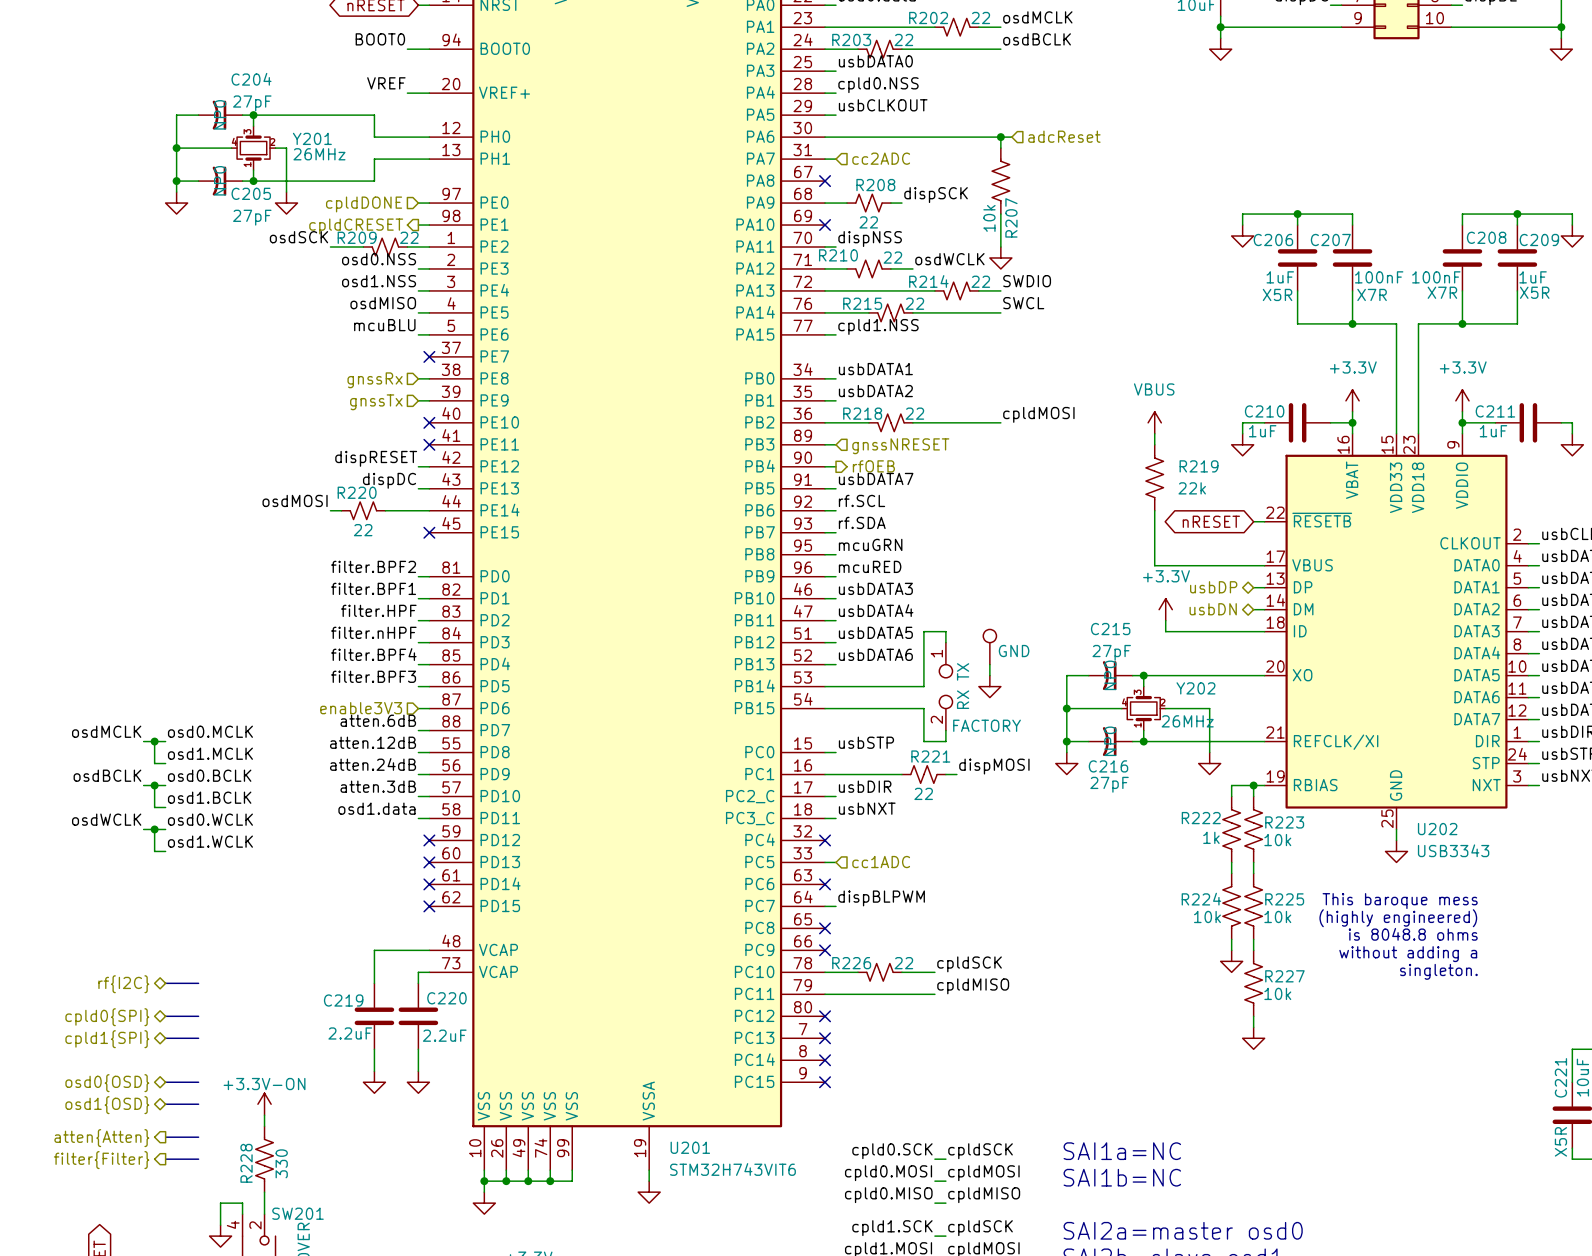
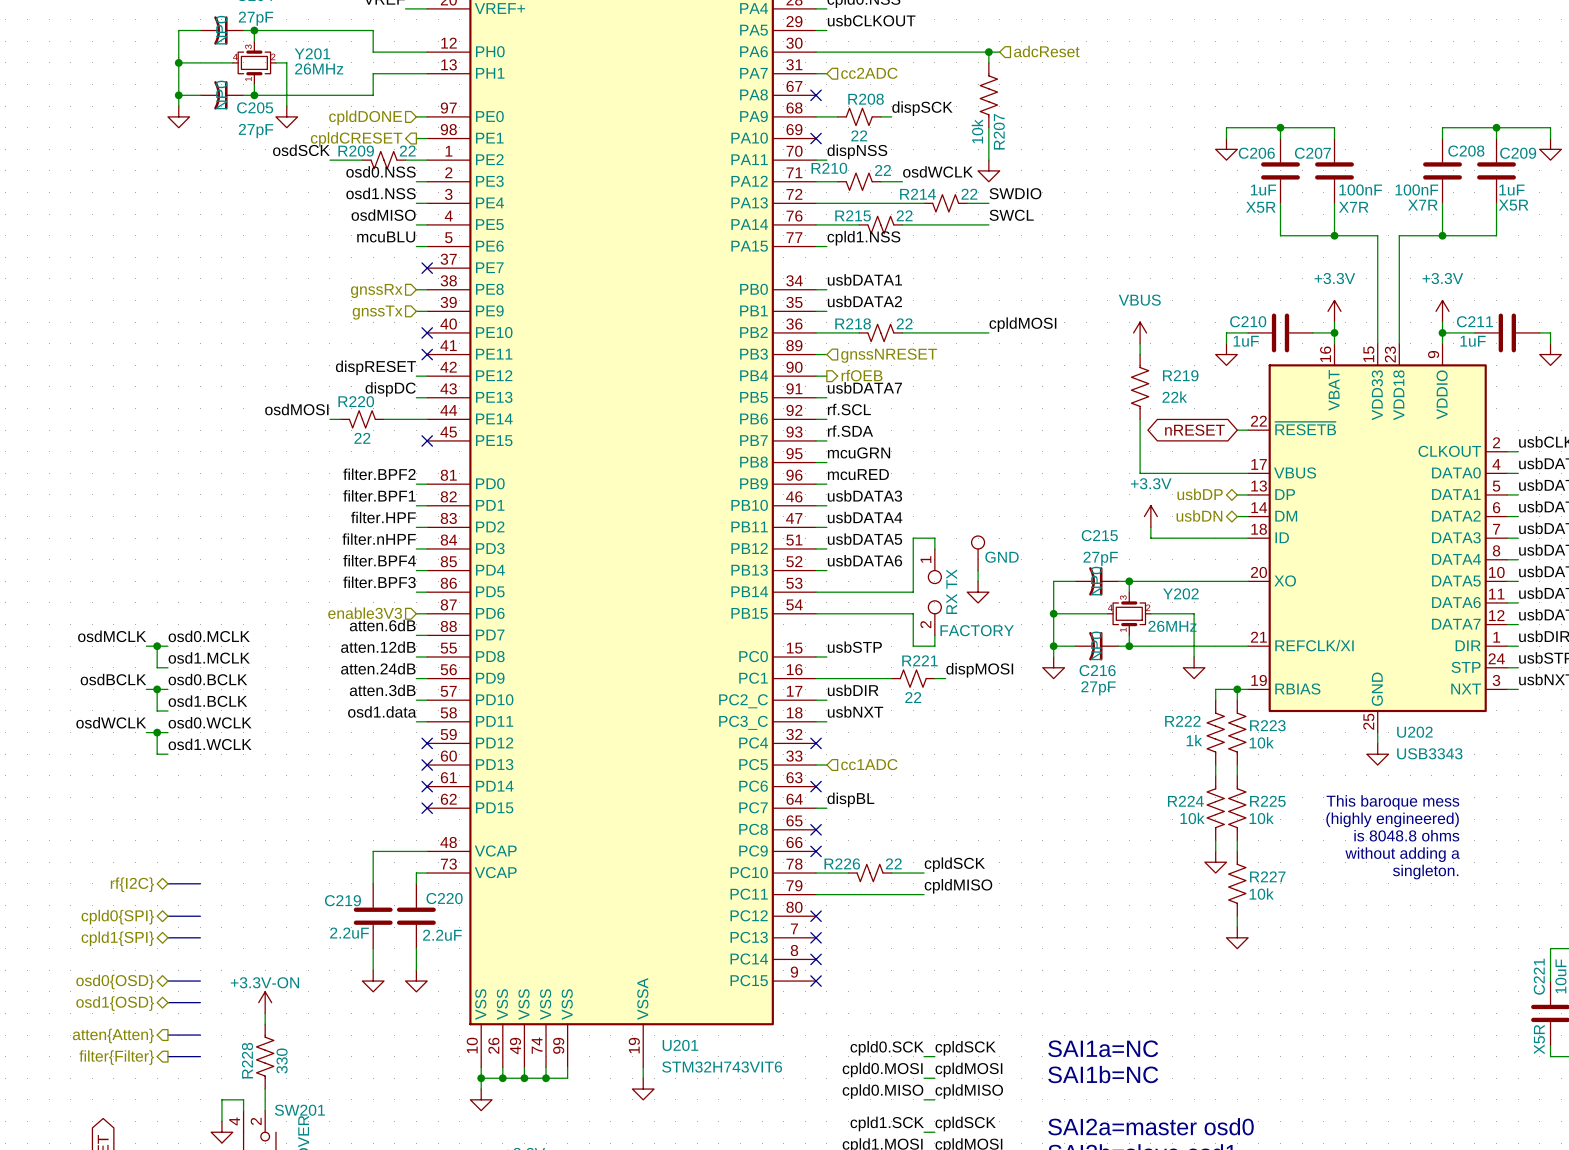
label: dispBLPWM (881, 898) -> dispBL (850, 799)

